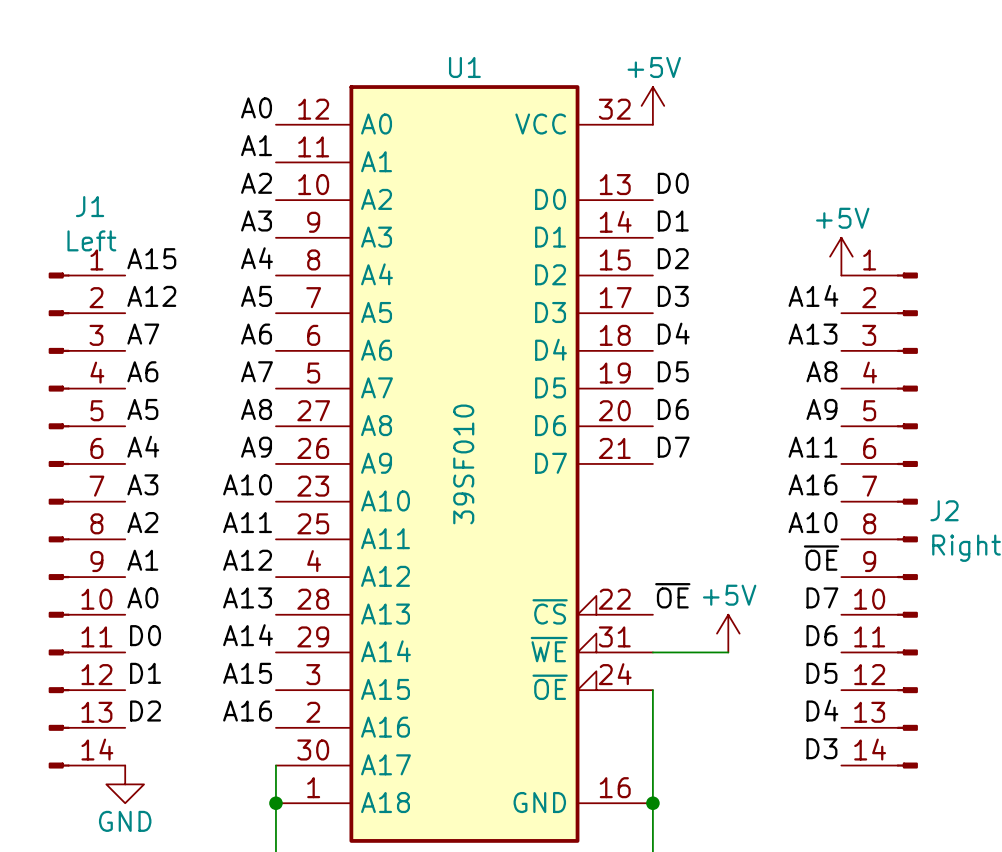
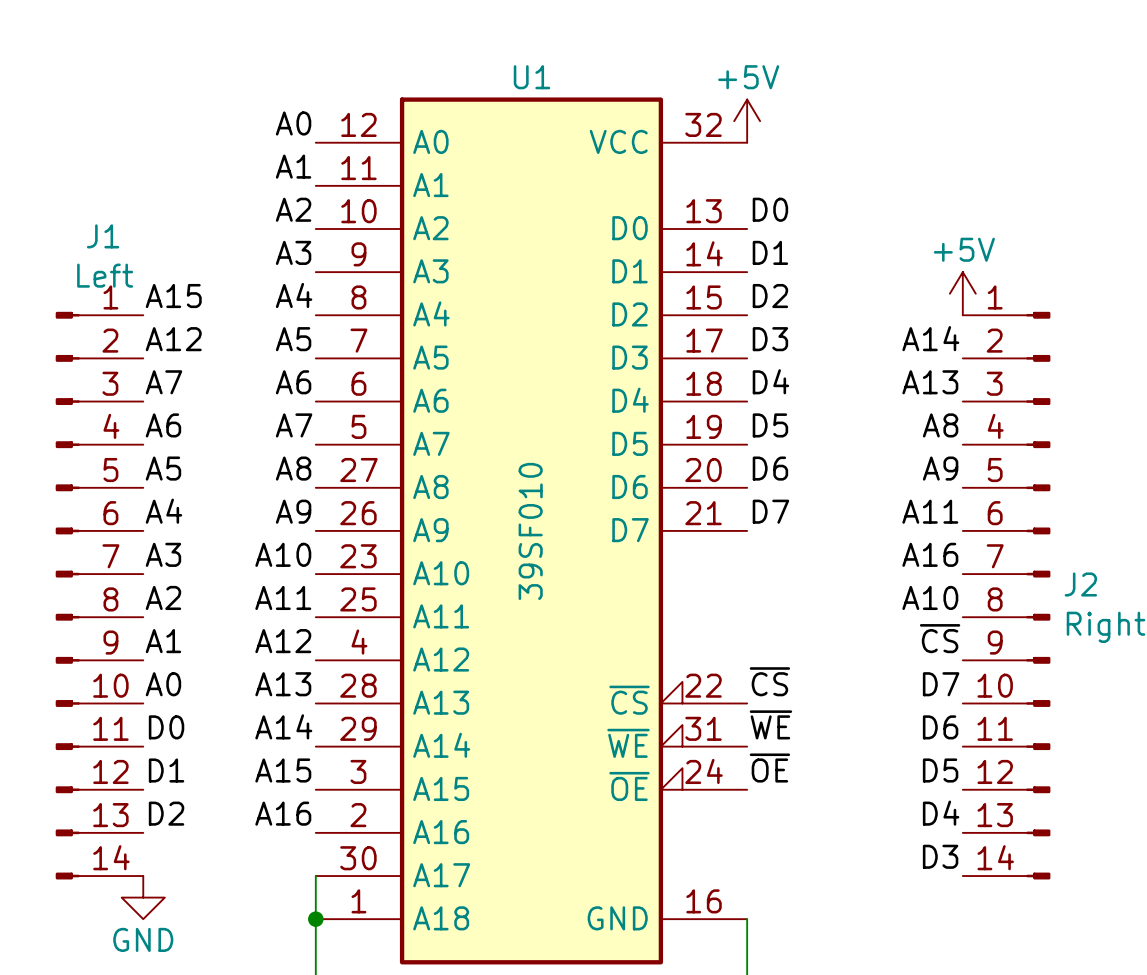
label: ~{OE} (821, 558) -> ~{CS} (940, 638)
label: ~{OE} (672, 595) -> ~{CS} (769, 681)
label: none -> ~{WE} (770, 724)
power symbol: +5V (728, 633) -> none
wire: (652, 652) (728, 652) -> none
label: none -> ~{OE} (769, 768)
wire: (652, 690) (652, 803) -> none
junction: (652, 803) -> none

